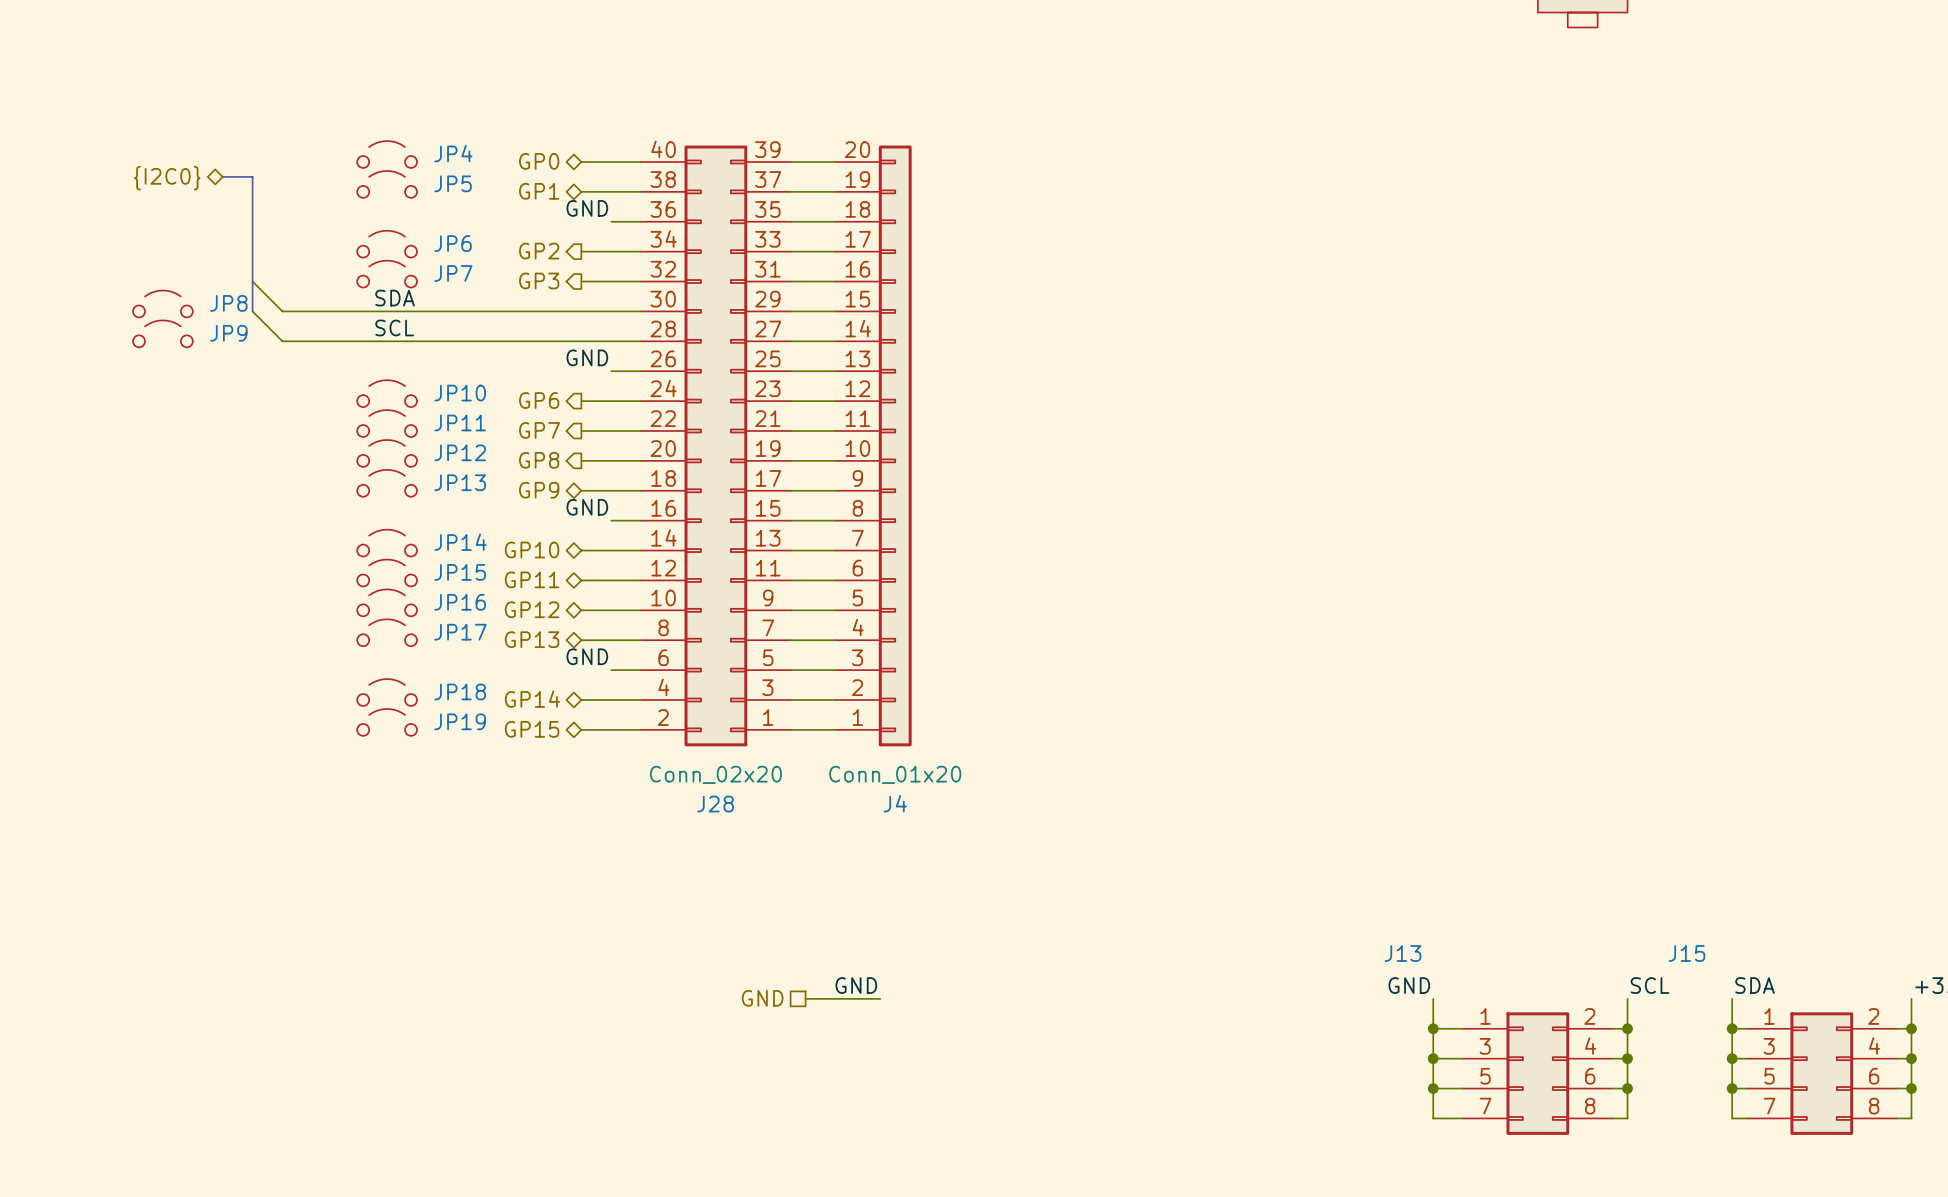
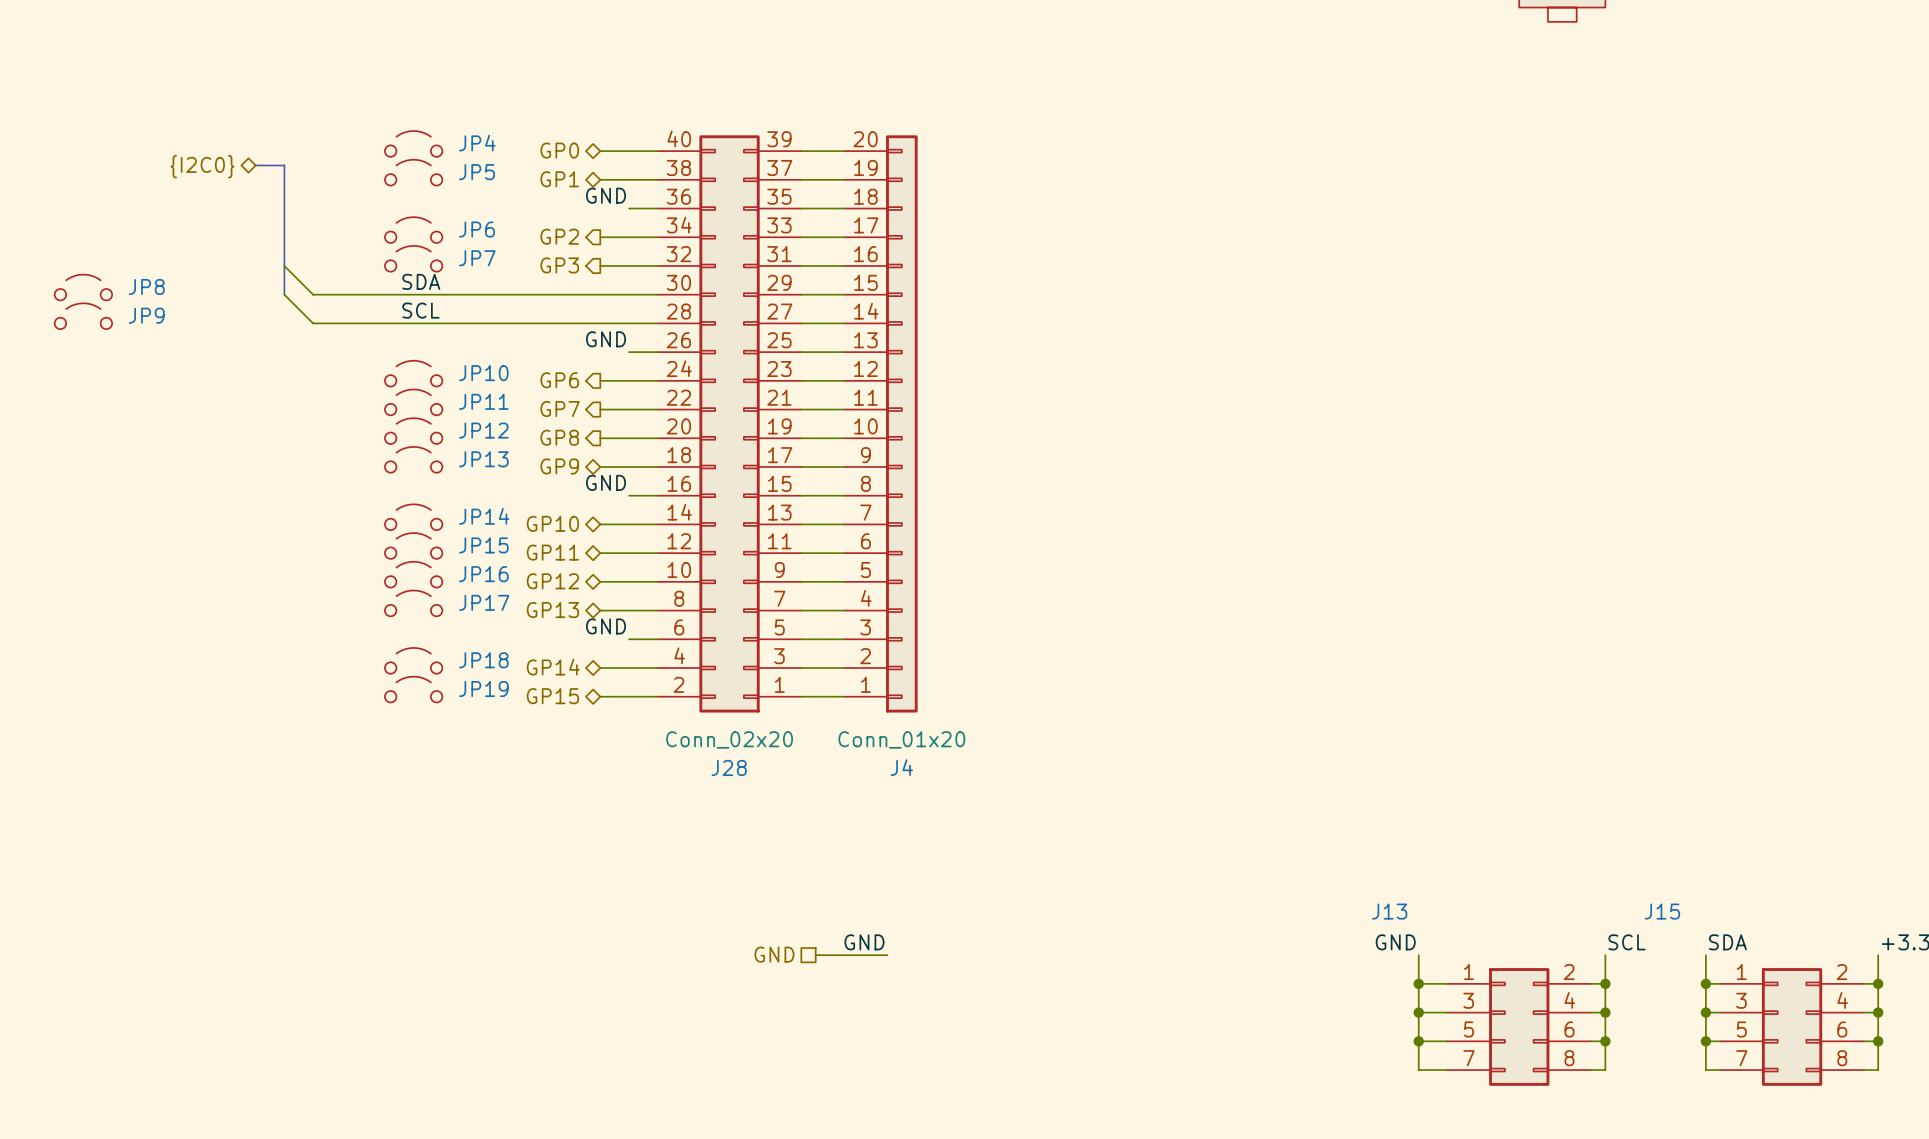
JP8 position: (162, 303) -> (83, 287)
JP9 position: (162, 333) -> (83, 316)

